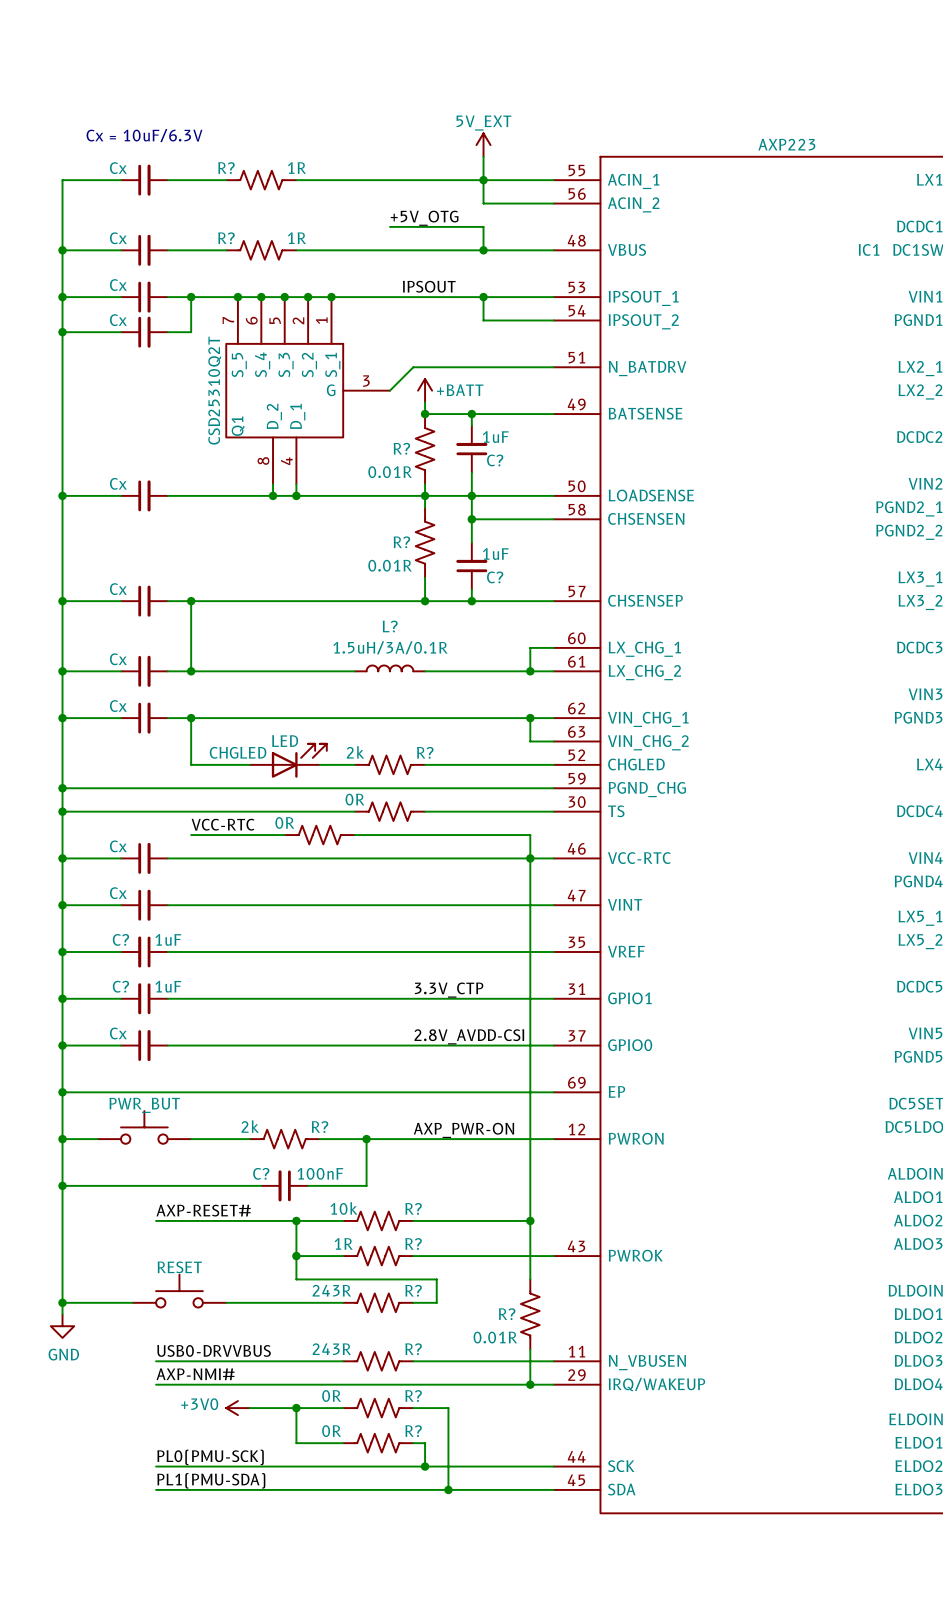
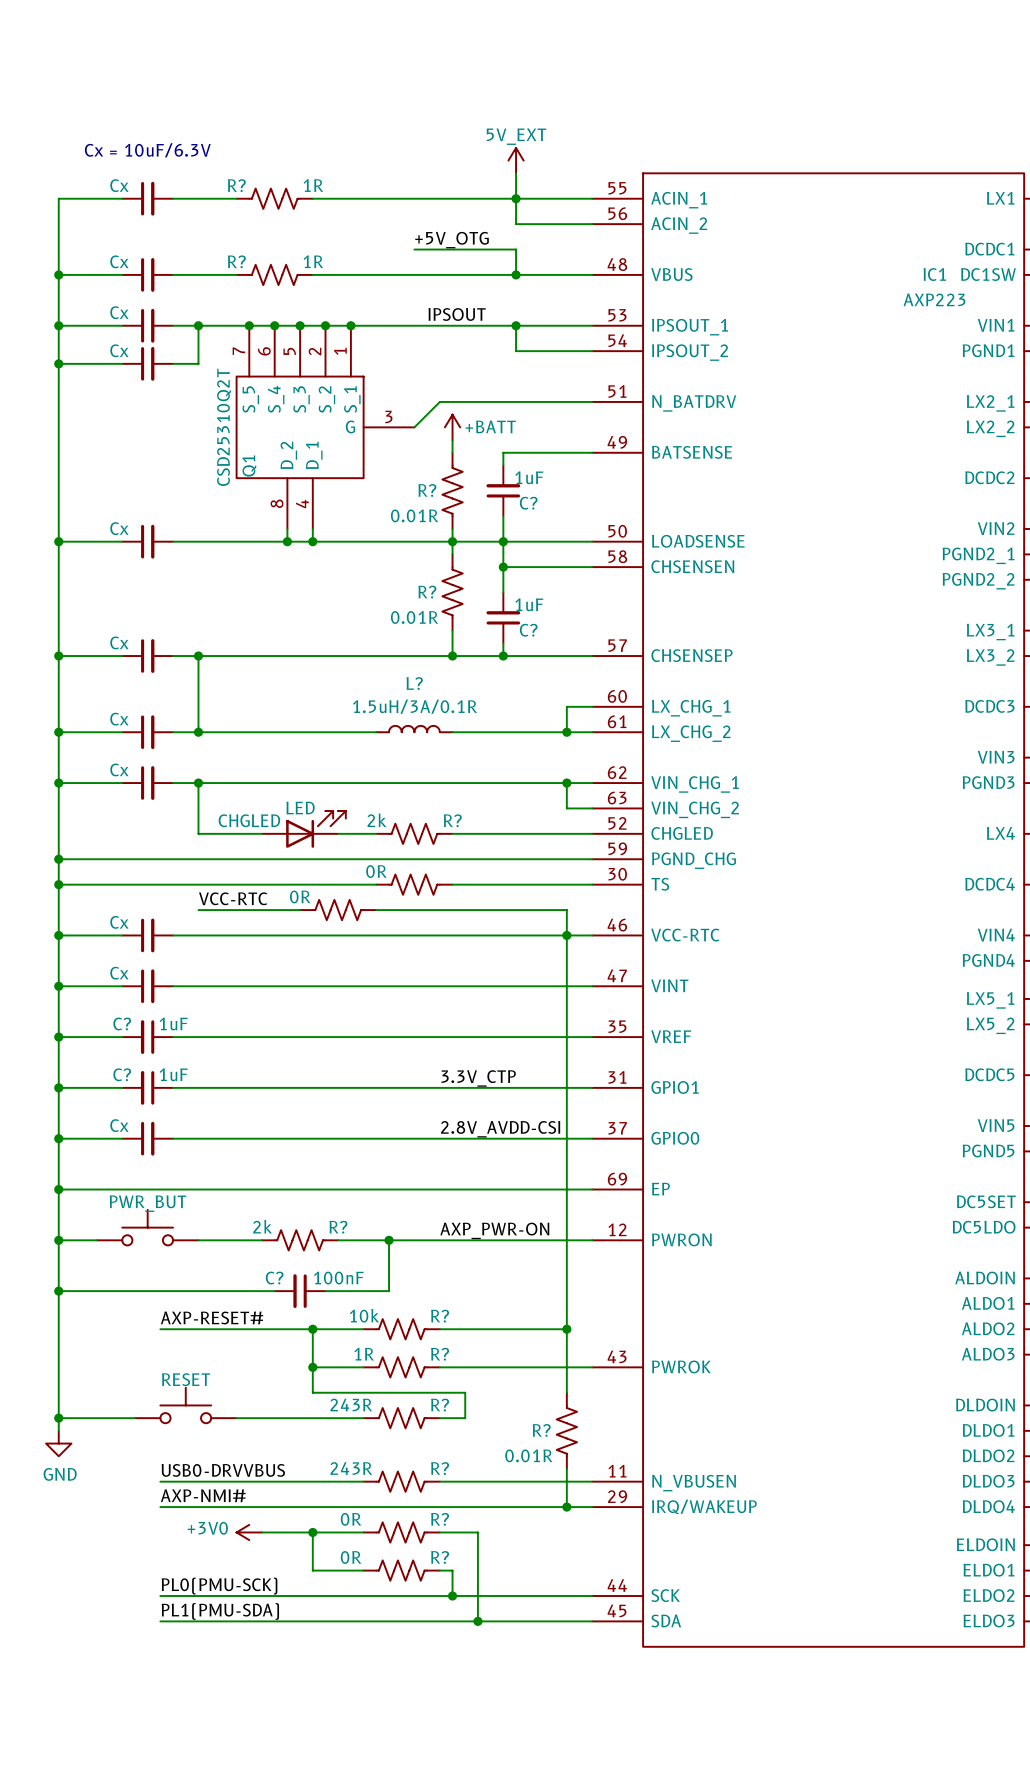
IC1 value position: AXP223 (786, 144) -> AXP223 (934, 299)
wire: (425, 414) (471, 414) -> none
junction: (425, 414) -> none
junction: (471, 414) -> none

